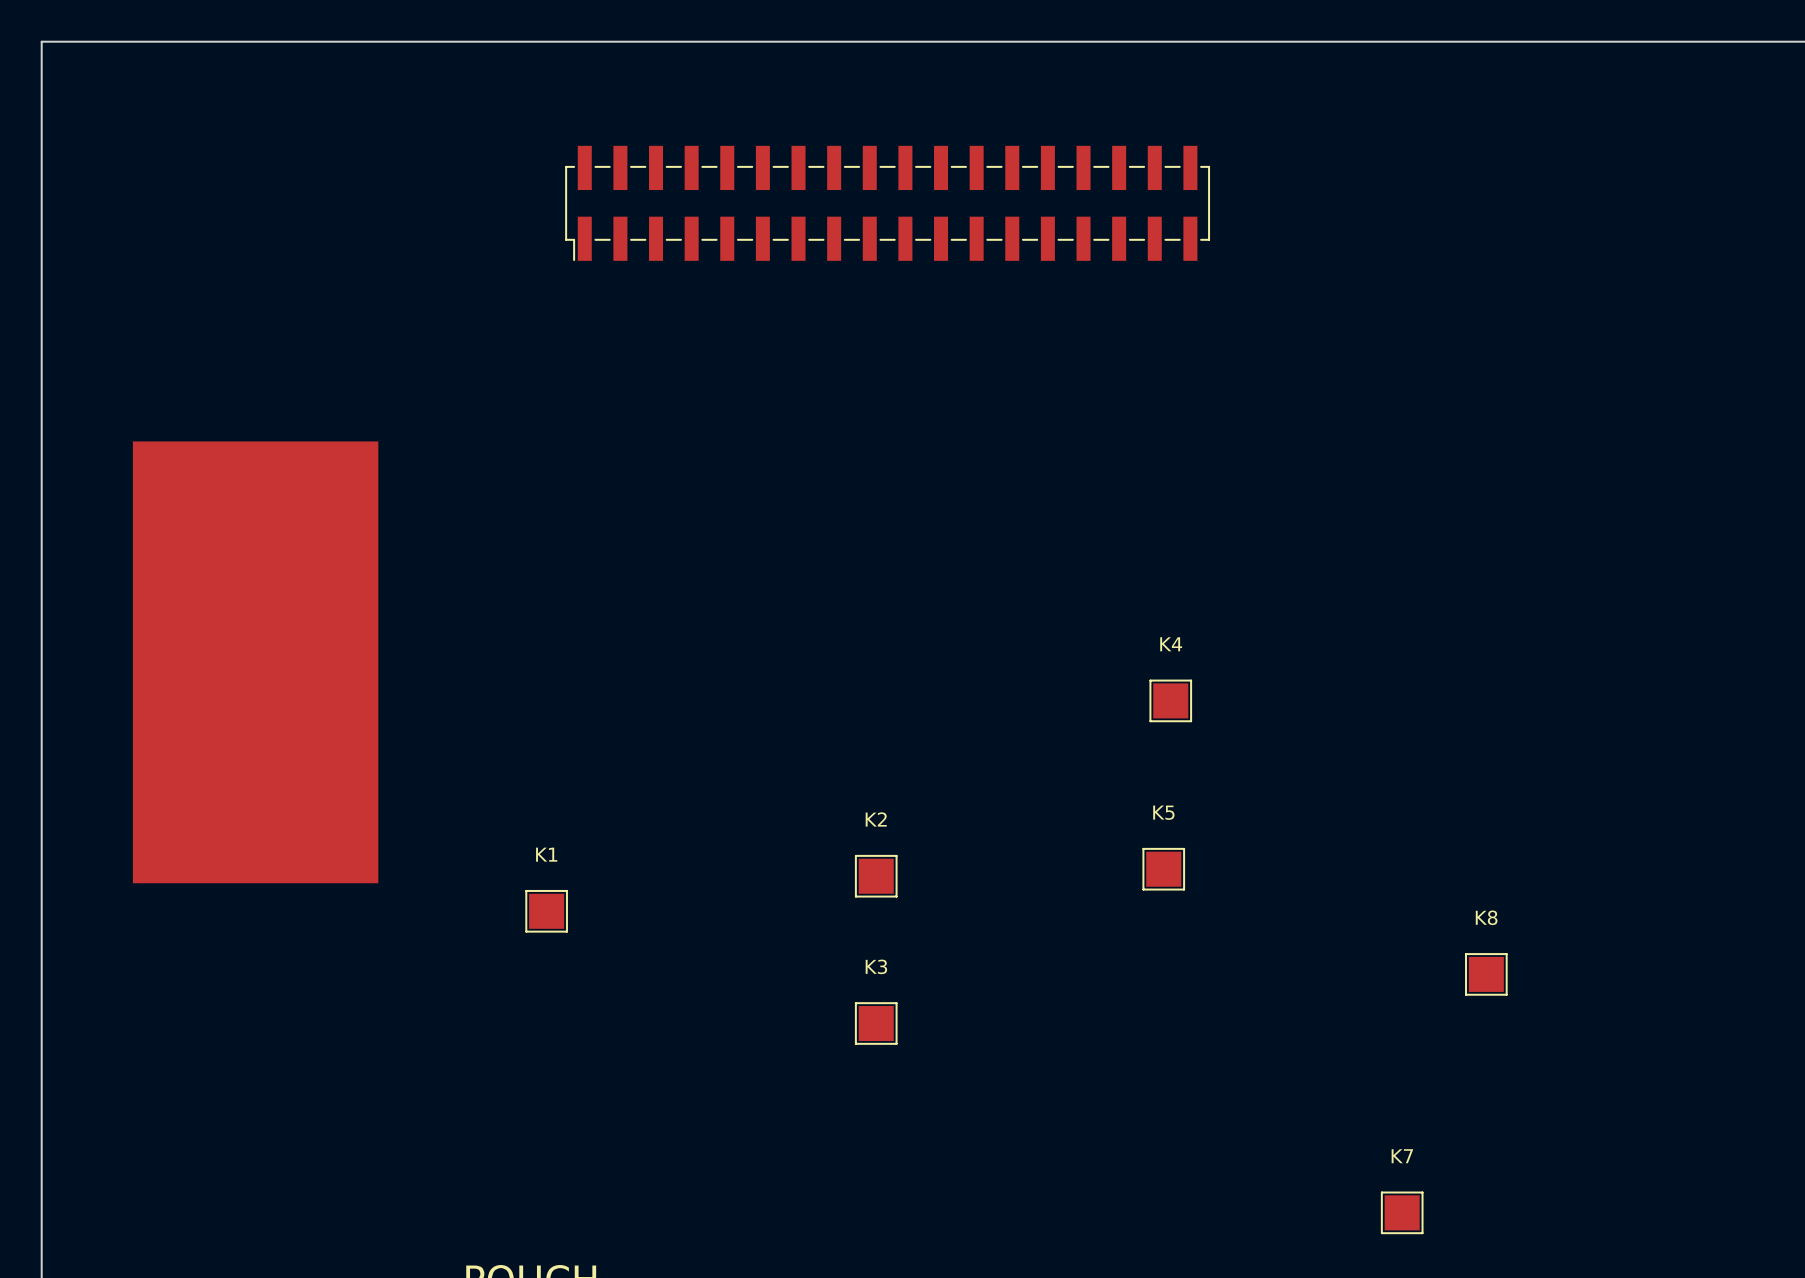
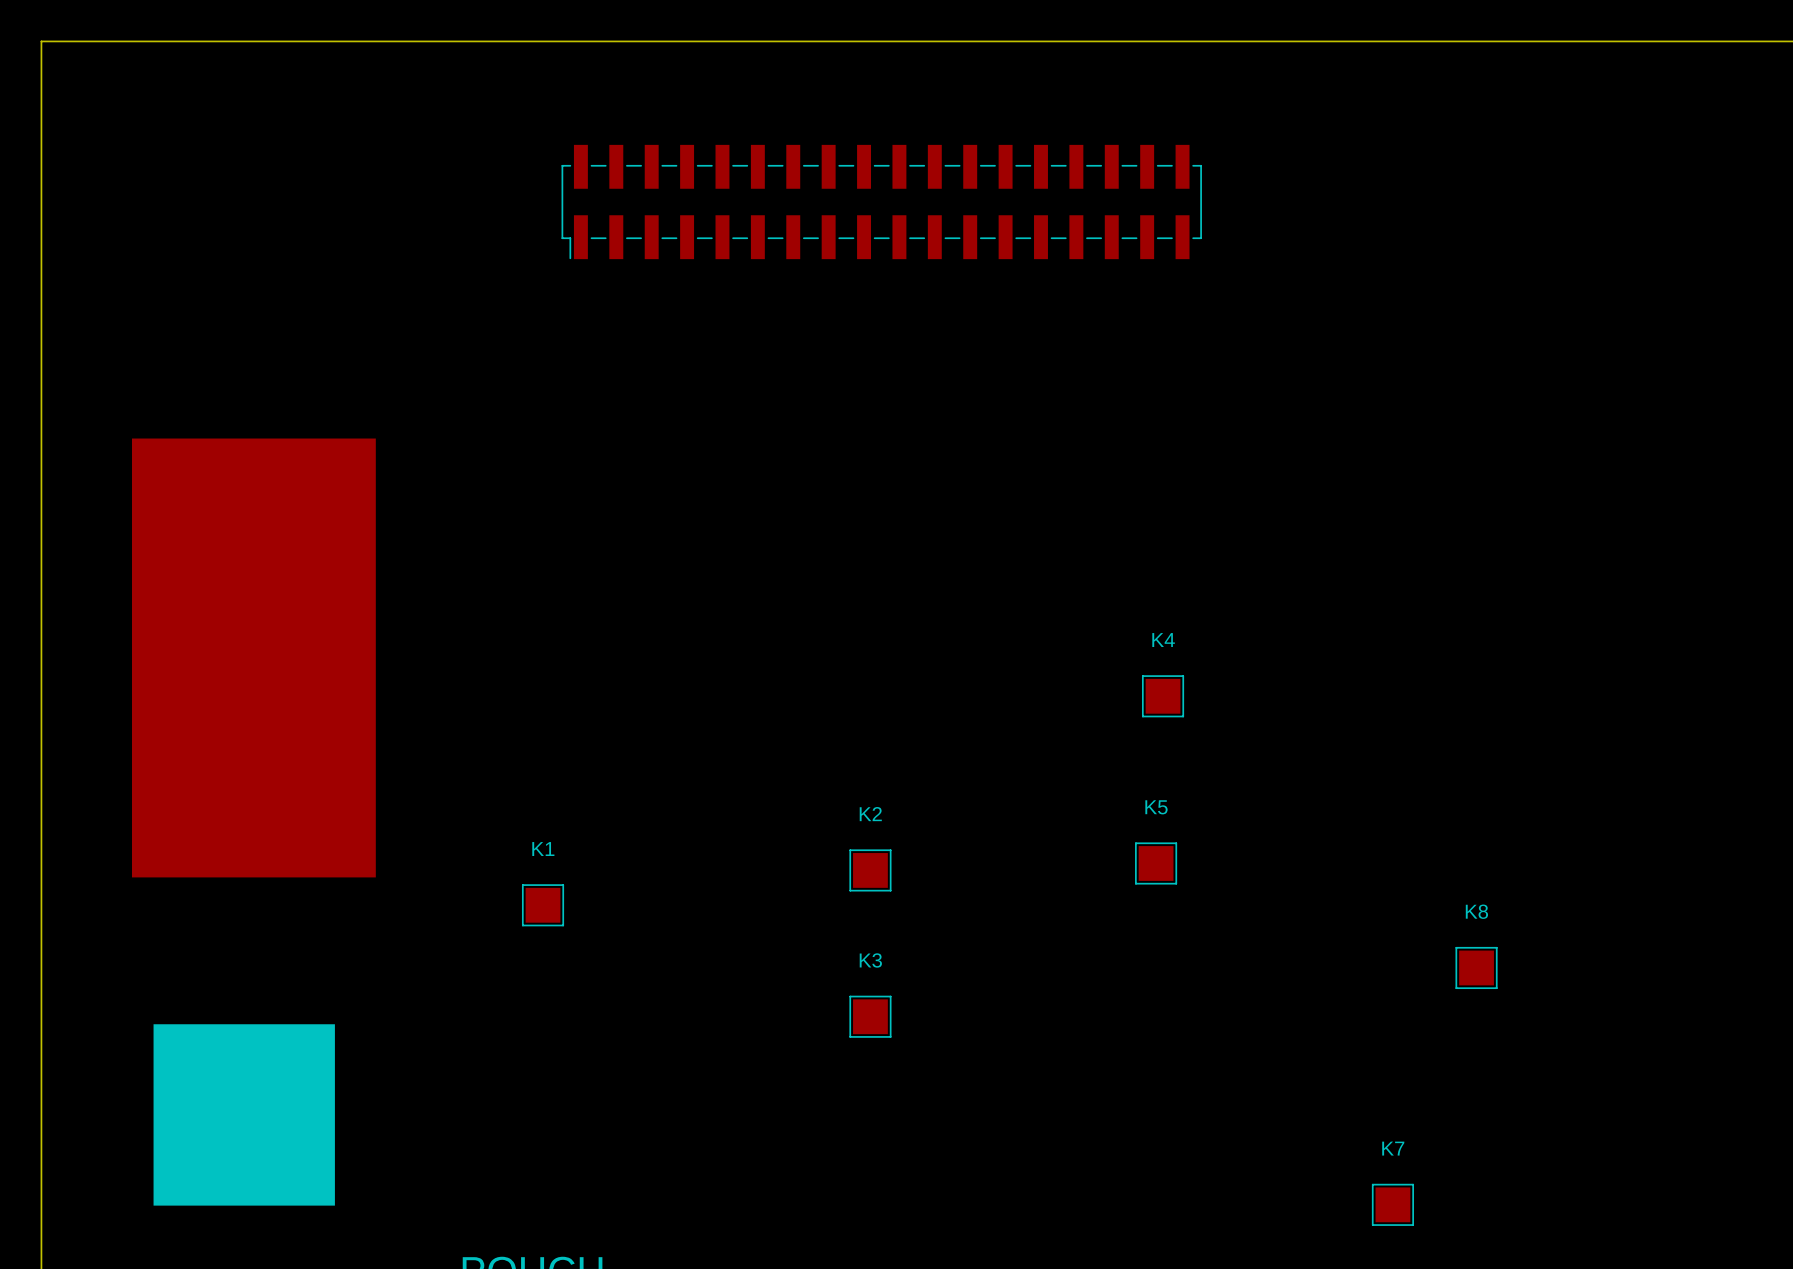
drawing: none -> [153, 1024, 335, 1206]

